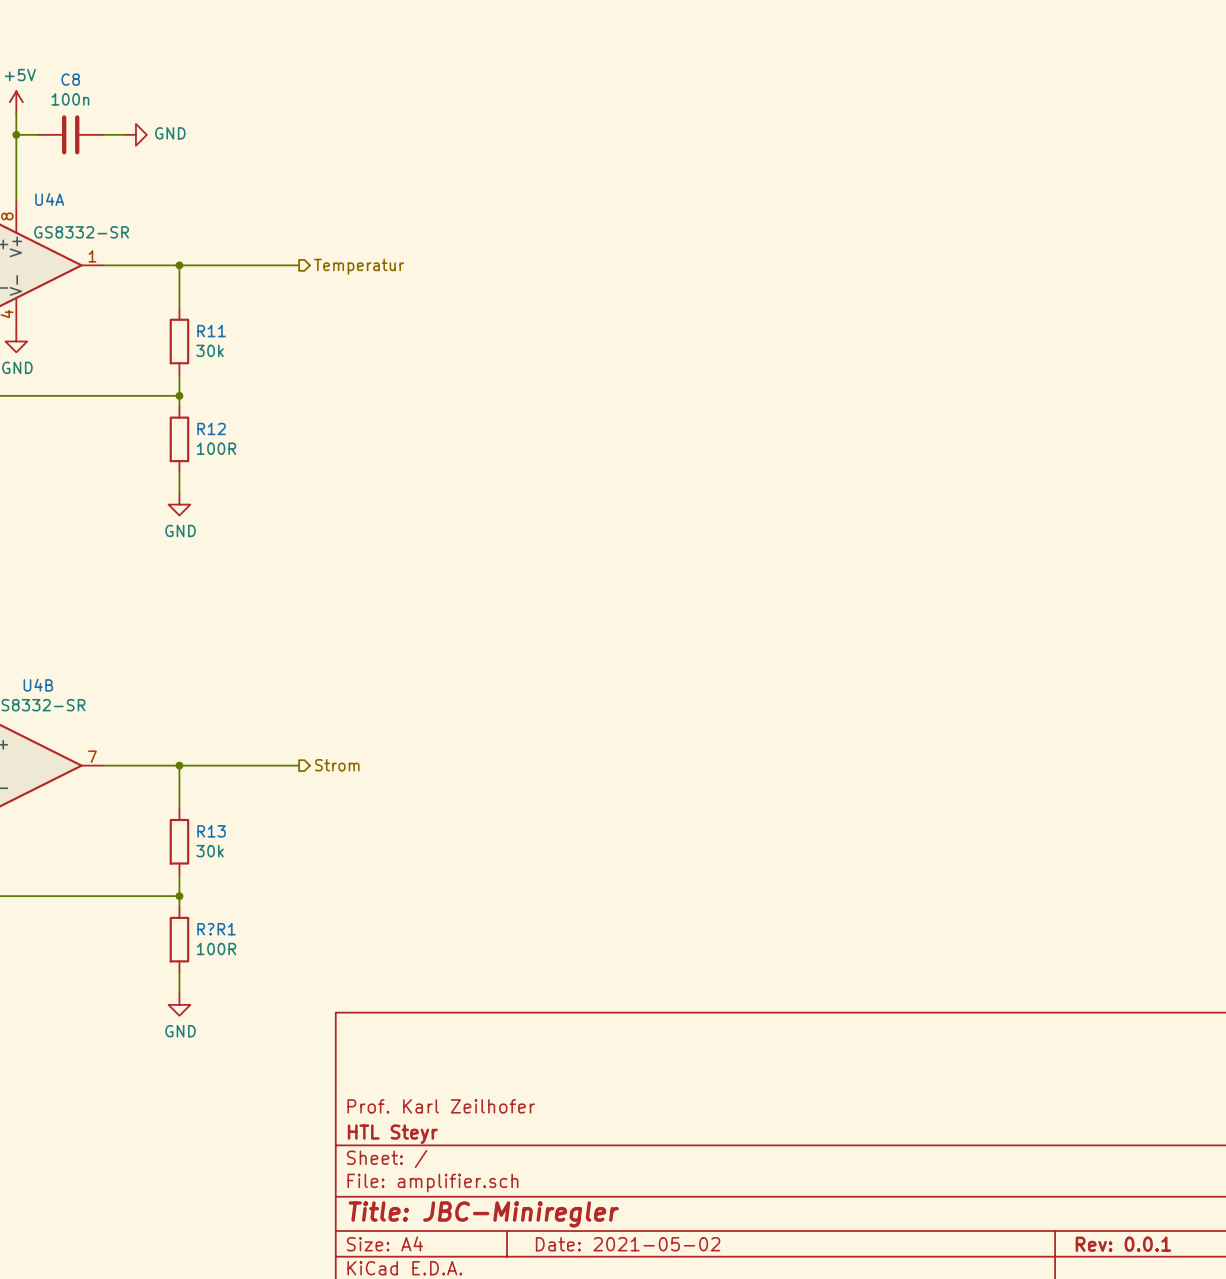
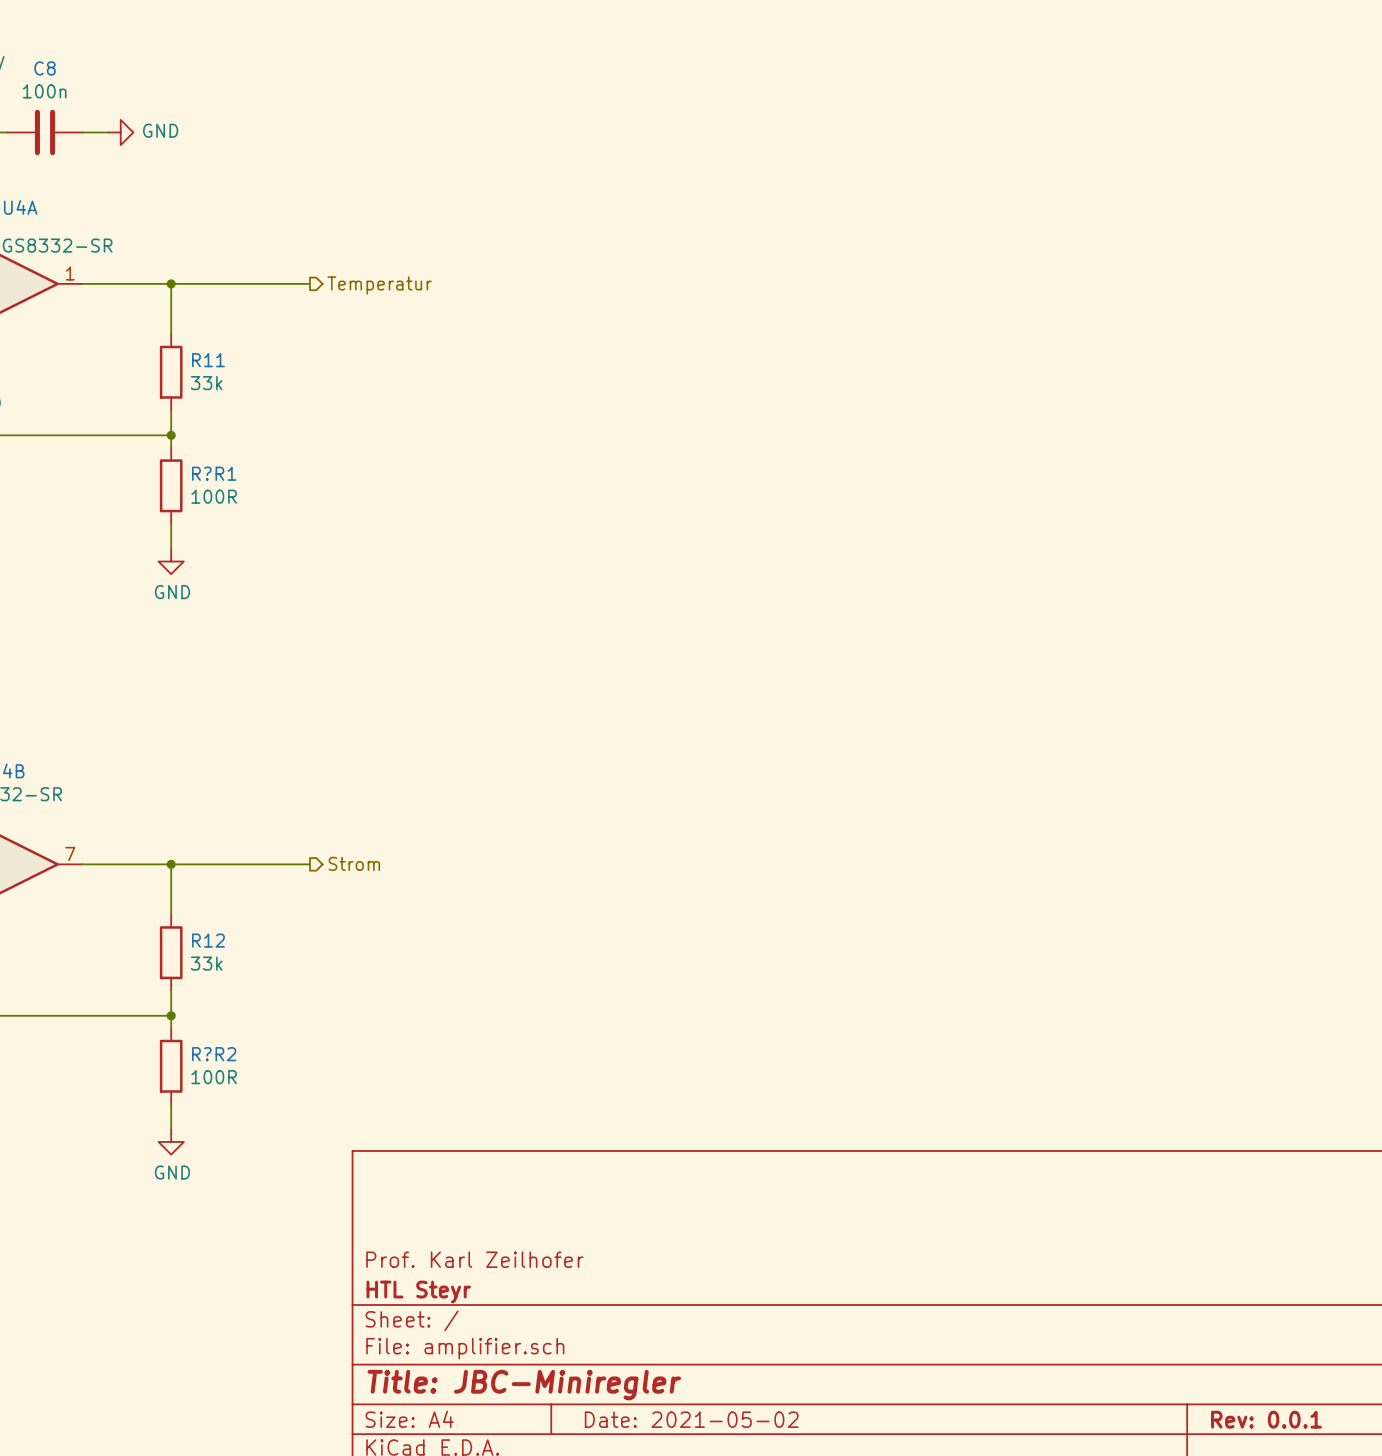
R11 value: 30k (210, 350) -> 33k (206, 383)
R12 name: R12 (211, 428) -> R?R1 (214, 473)
R13 name: R13 (211, 831) -> R12 (208, 940)
R13 value: 30k (210, 851) -> 33k (206, 963)
R?R1 name: R?R1 (216, 929) -> R?R2 (214, 1054)

